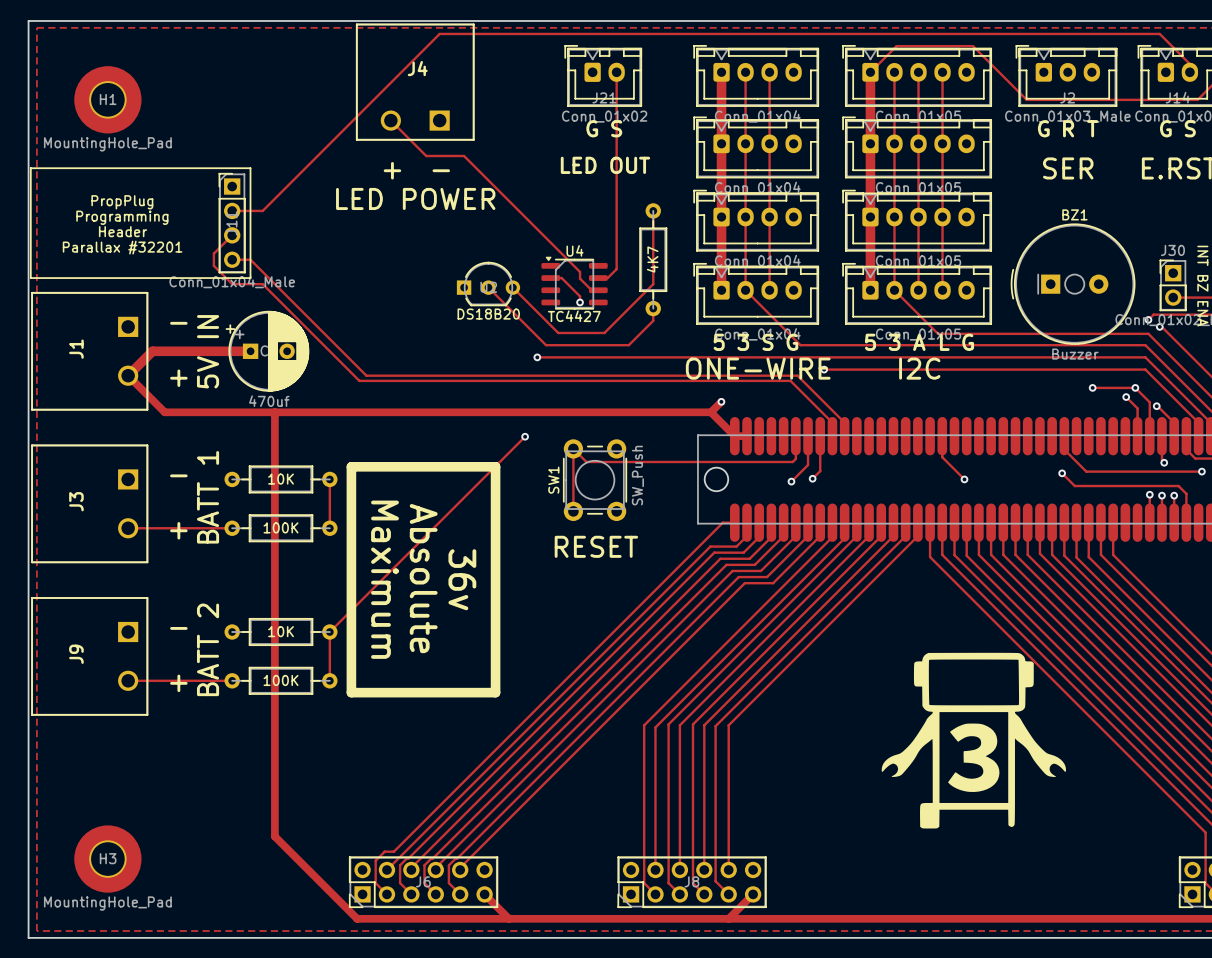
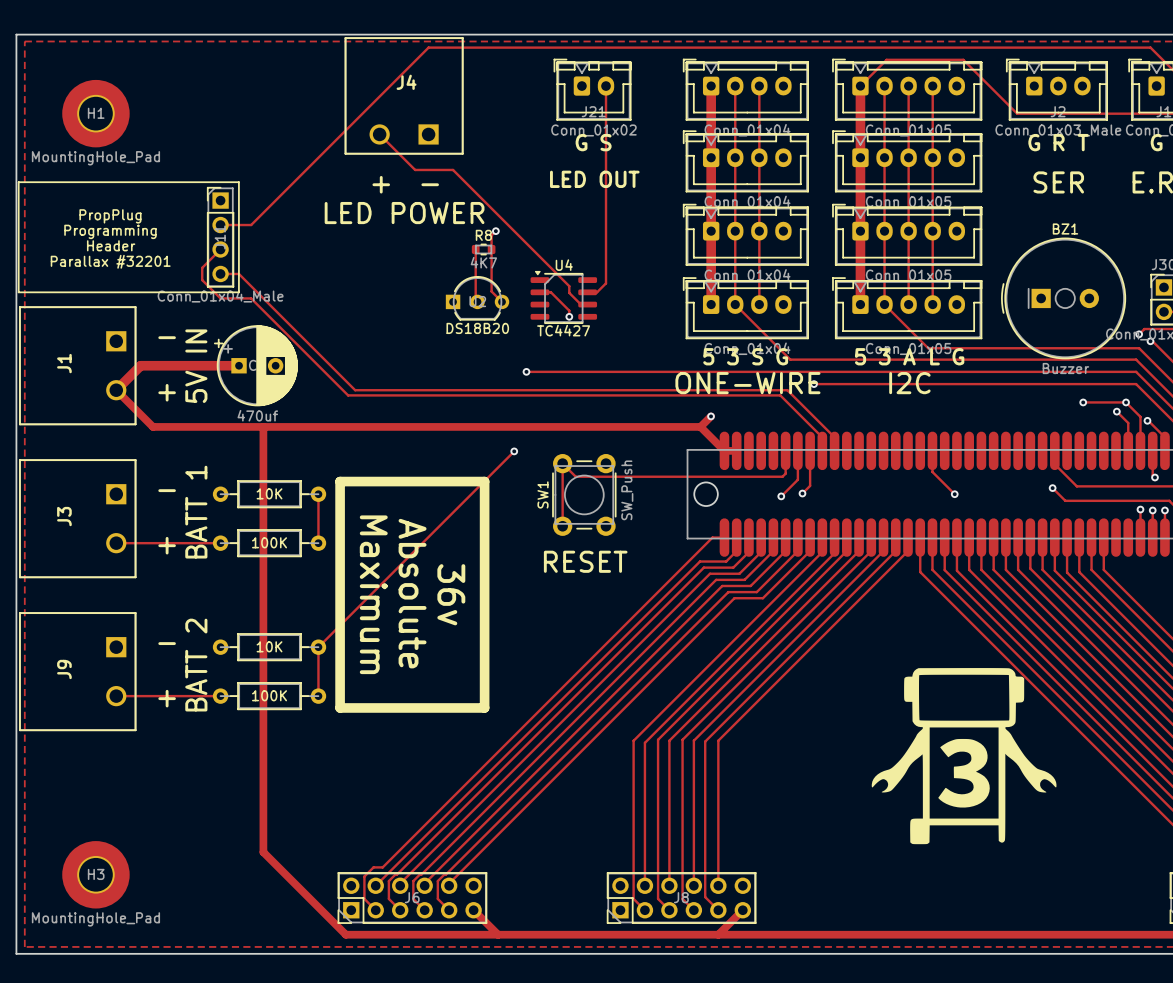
track: (653, 210) (653, 284) (604, 332) (558, 332) (512, 287) -> (495, 231) (491, 235) (491, 291) (502, 301)
via: none -> (495, 231)
R8: none -> 4K7 (483, 249)
part: 4K7 (653, 259) -> none
track: (488, 287) (546, 345) (628, 345) (653, 320) (653, 308) -> (477, 301) (475, 300) (475, 249)

